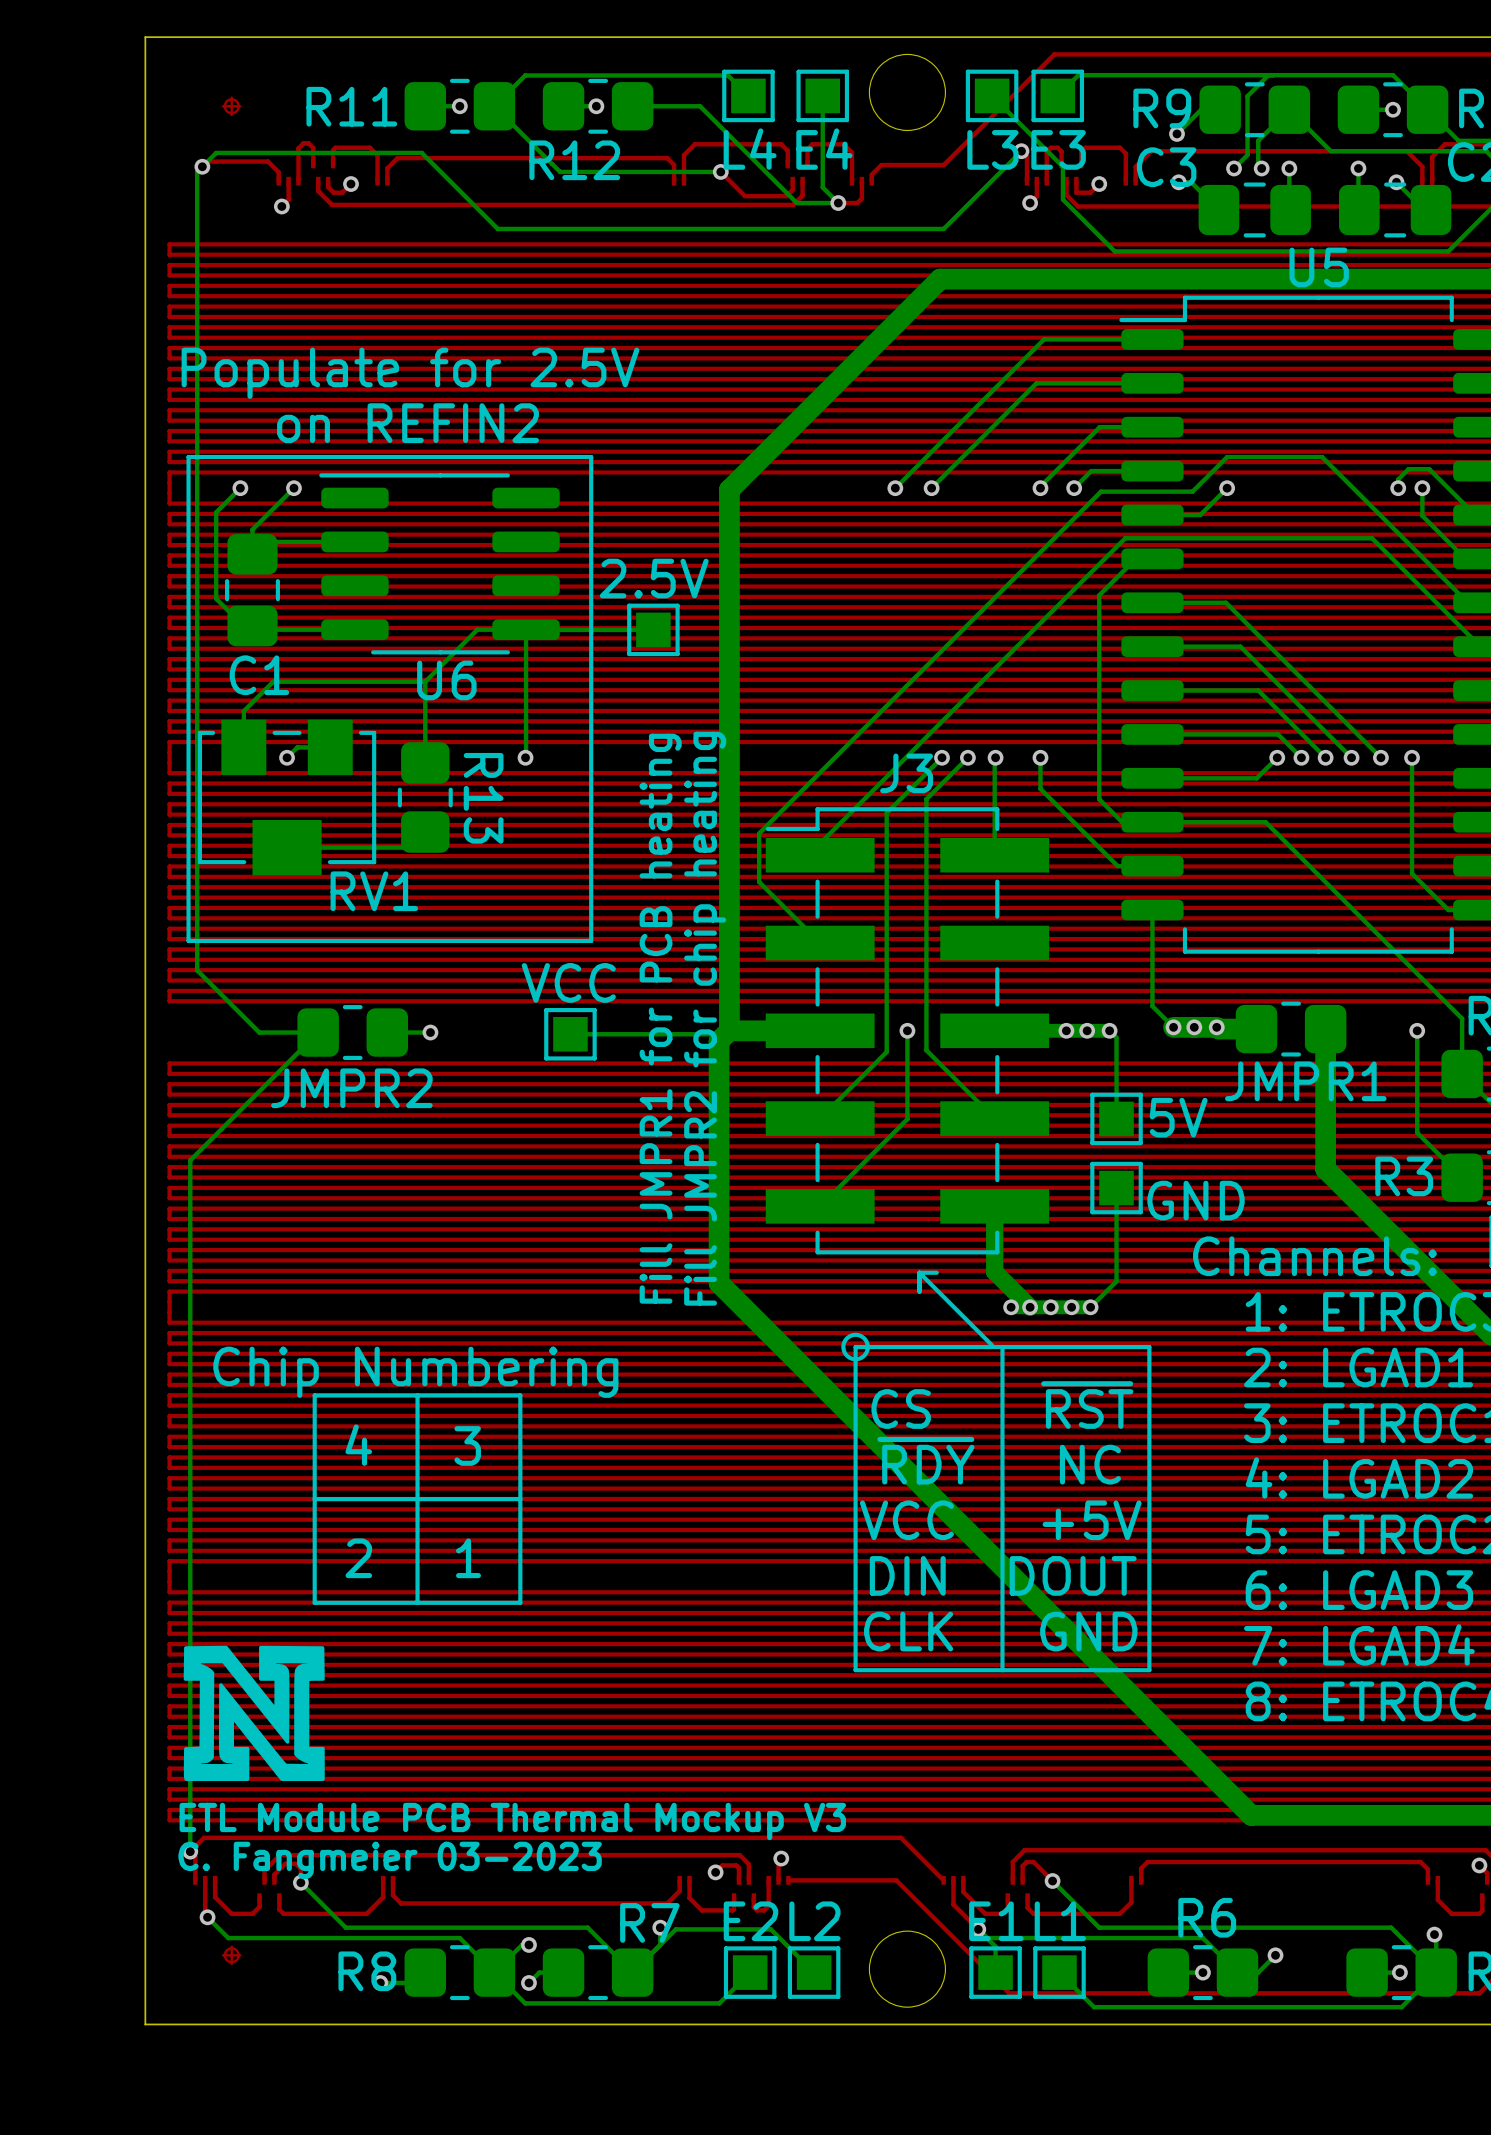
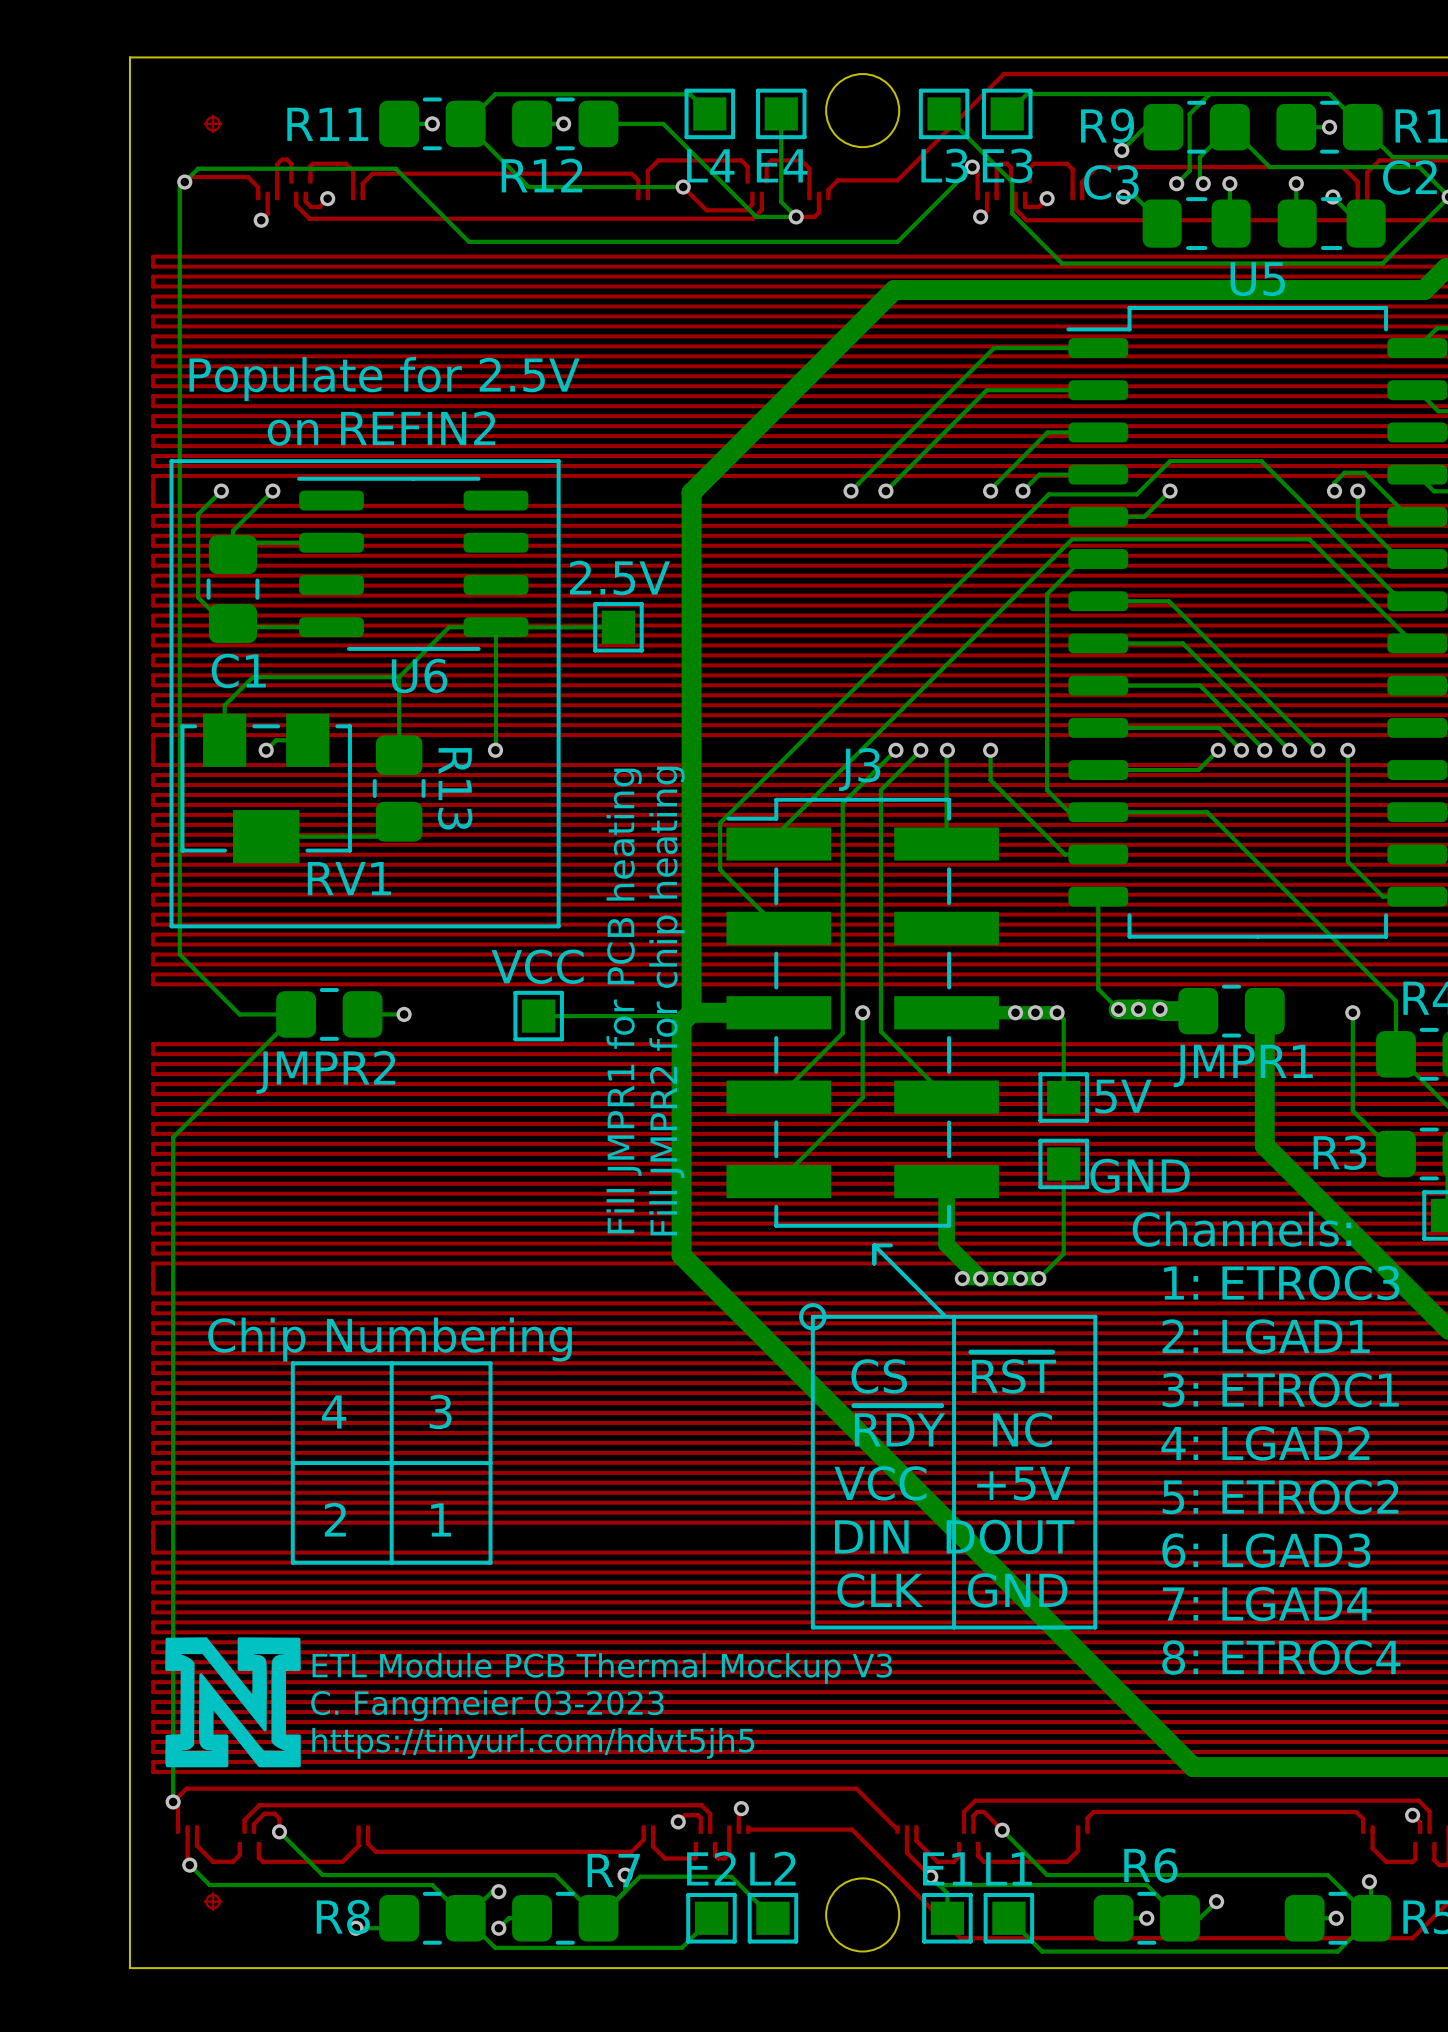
drawing position: (254, 1713) -> (232, 1702)
text: none -> https://tinyurl.com/hdvt5jh5 (533, 1743)
text position: ETL Module PCB Thermal Mockup V3 (512, 1821) -> ETL Module PCB Thermal Mockup V3 (602, 1668)
text position: C. Fangmeier 03-2023 (390, 1860) -> C. Fangmeier 03-2023 (487, 1705)

